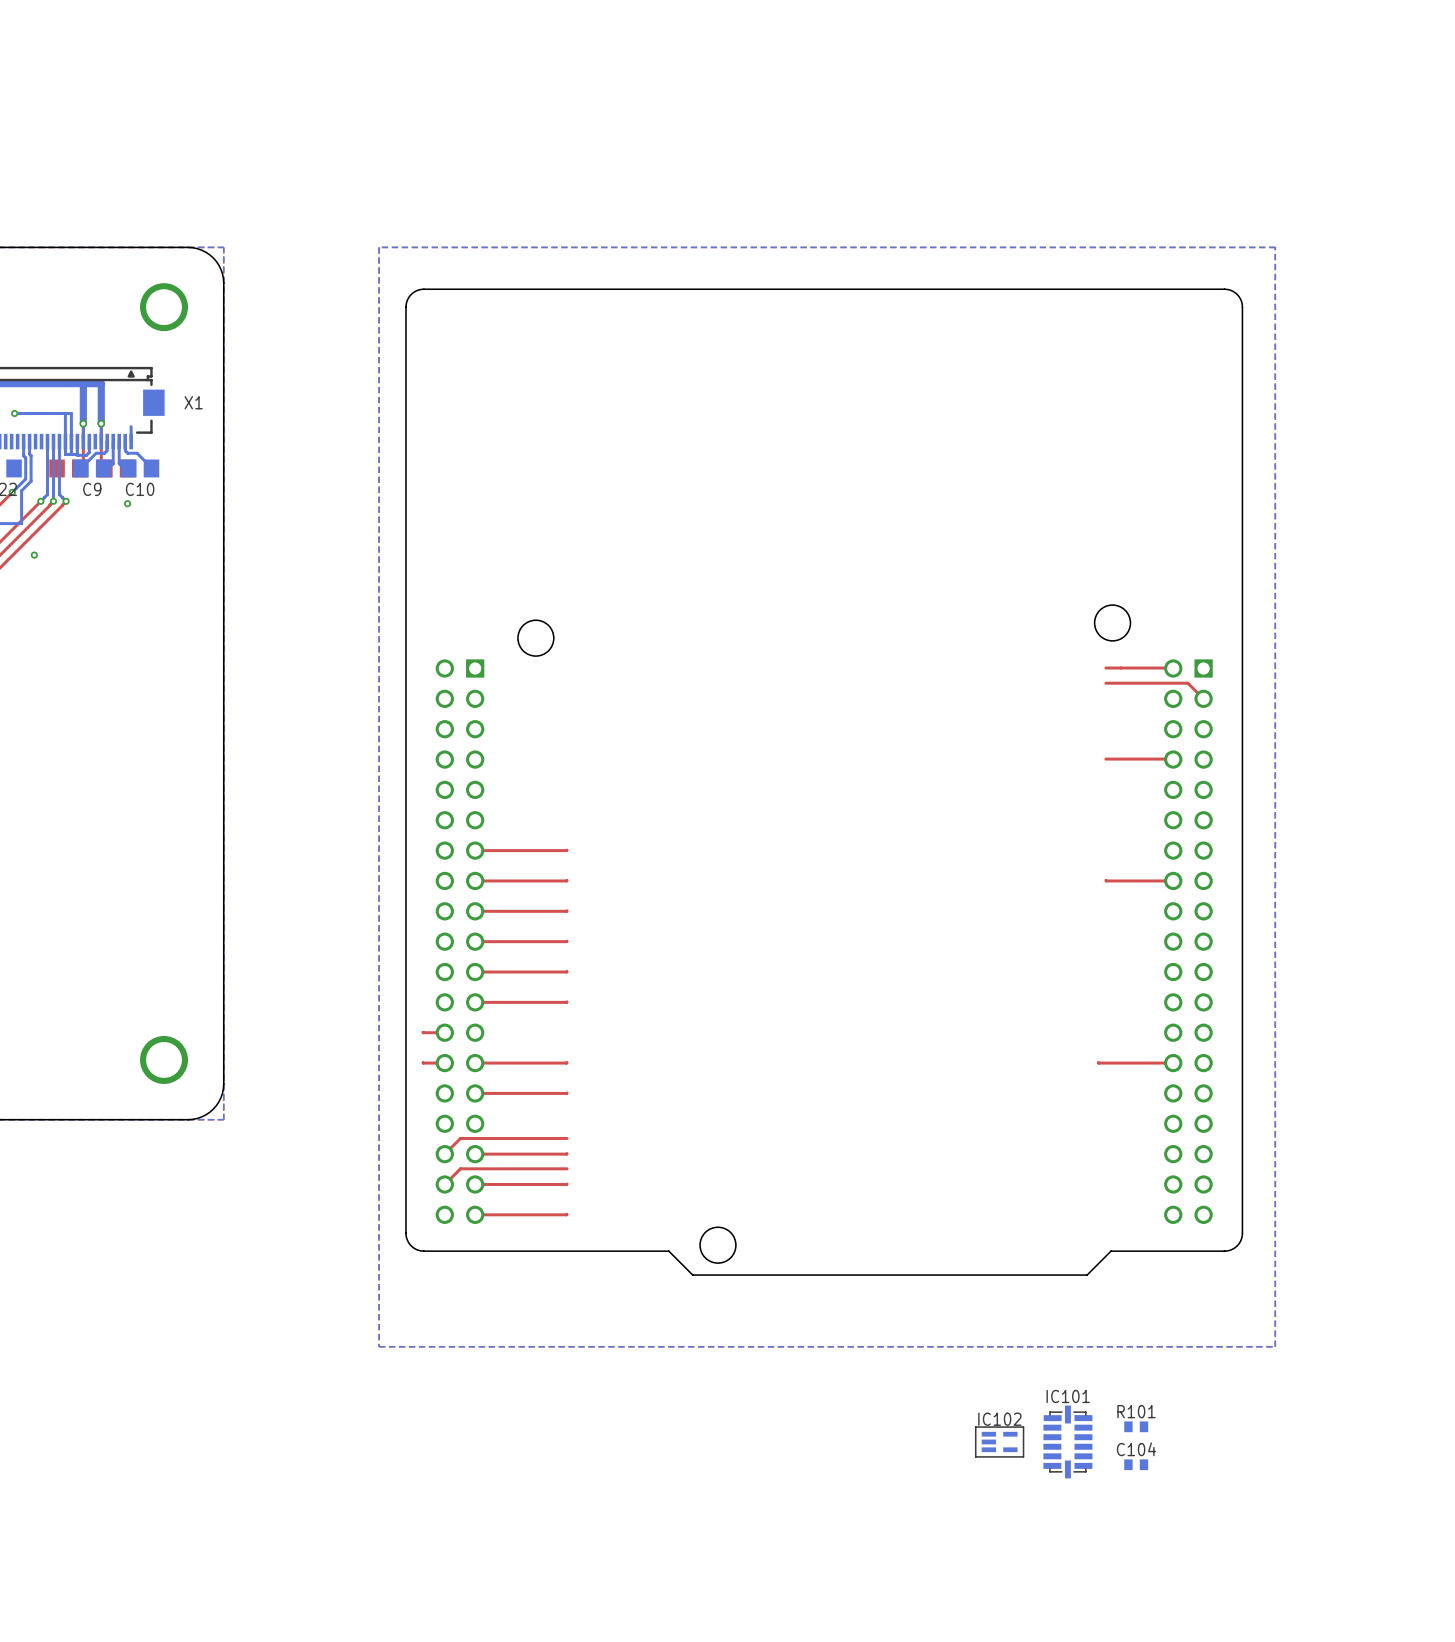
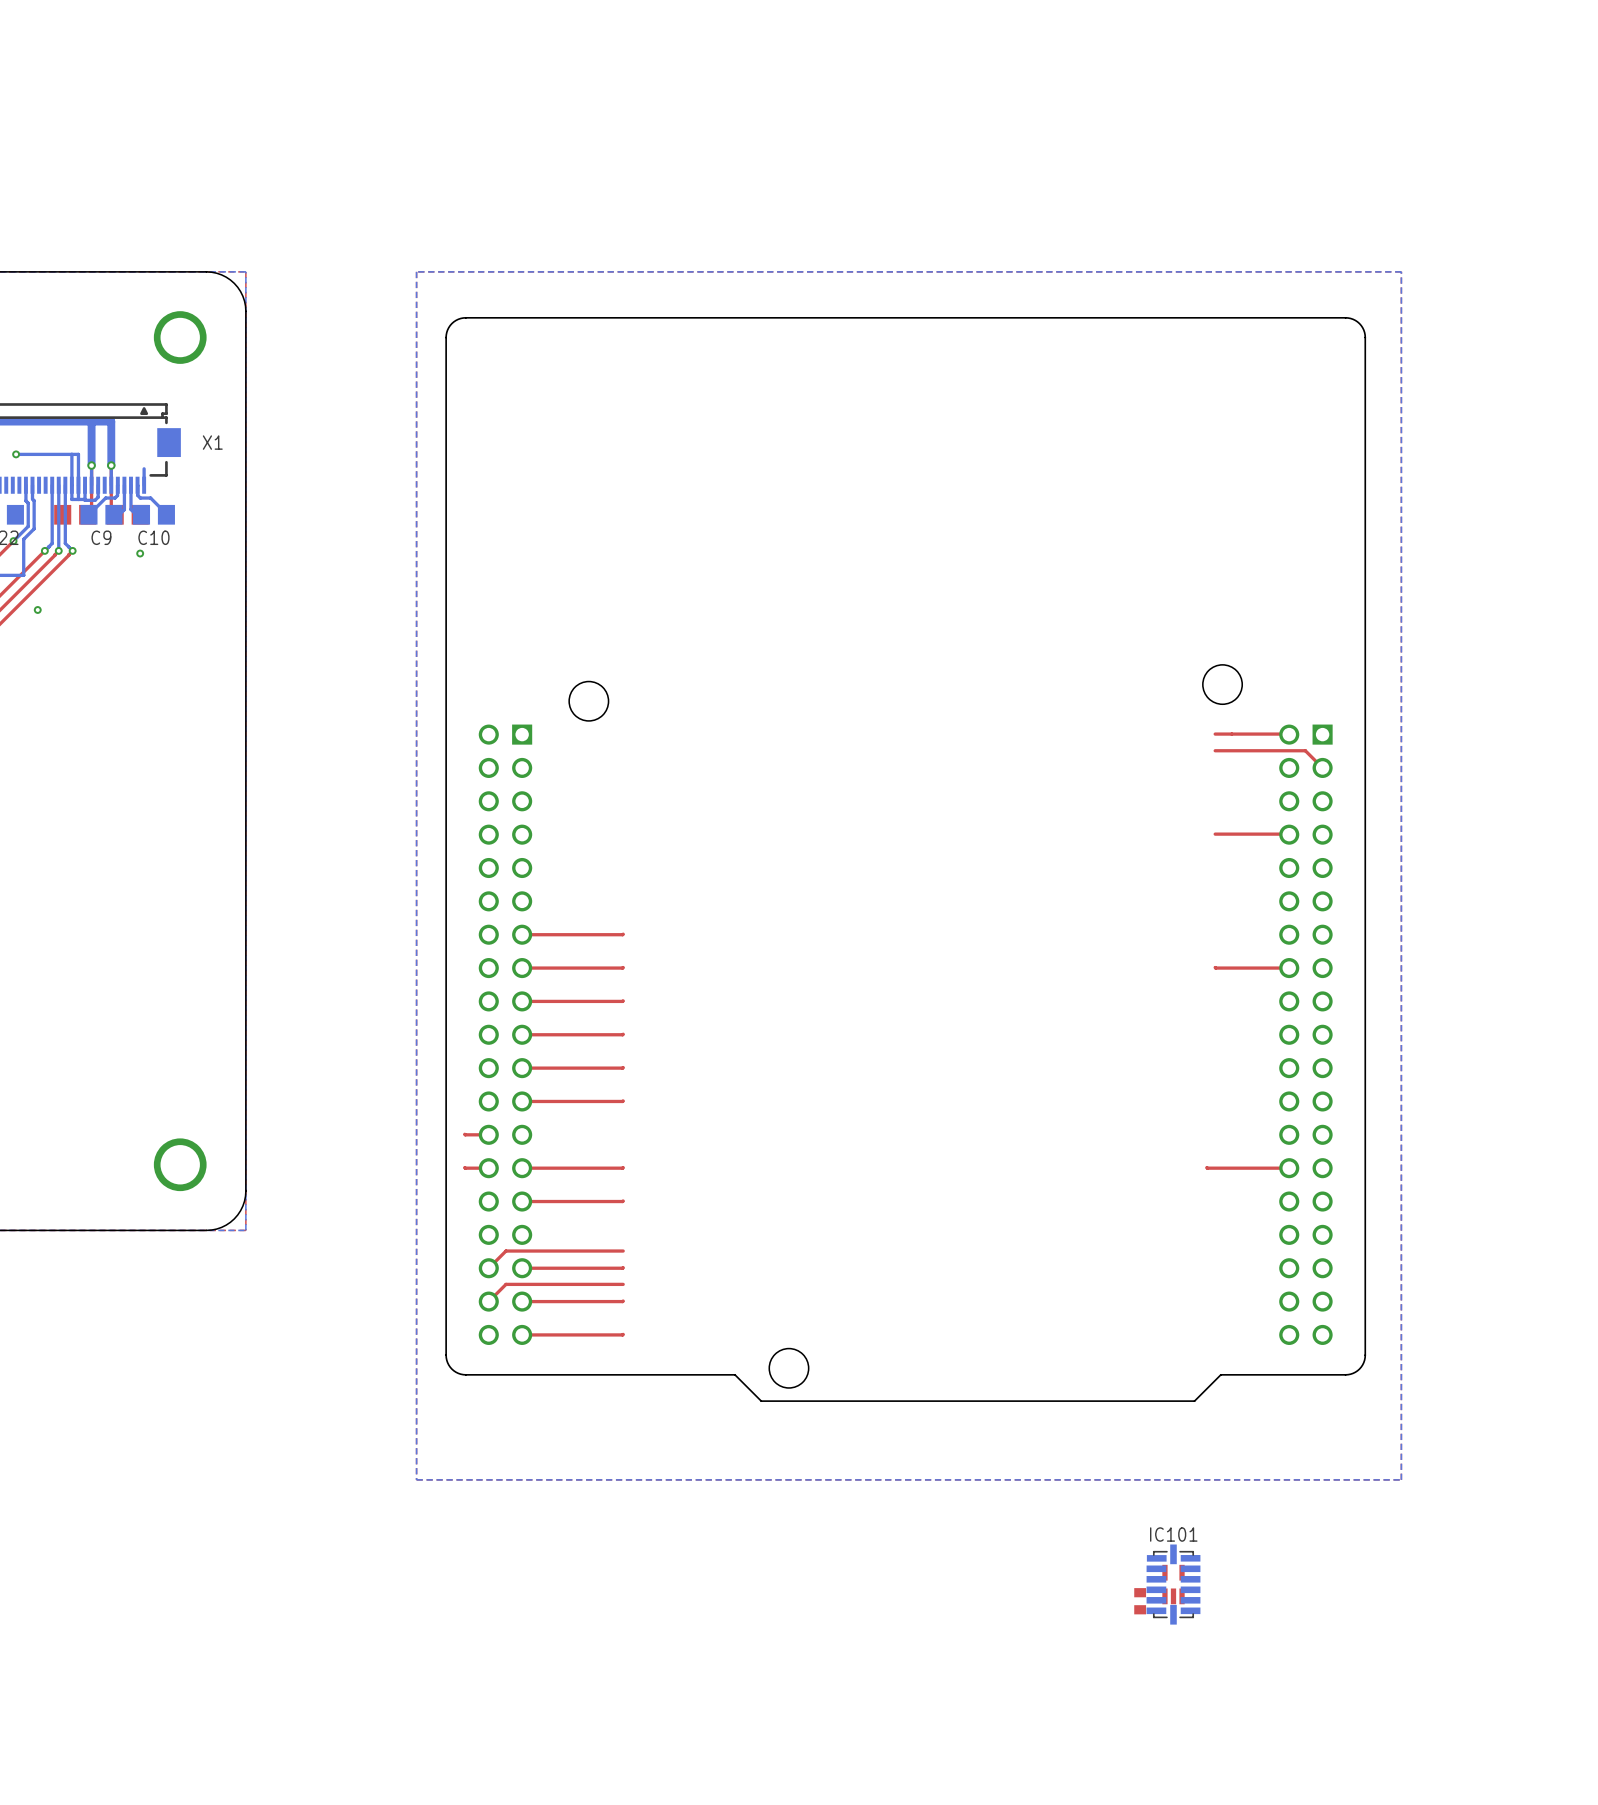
R101: (1136, 1426) -> none
IC102 side: bottom (999, 1441) -> top (1173, 1584)
C104 side: bottom (1136, 1464) -> top (1140, 1601)

